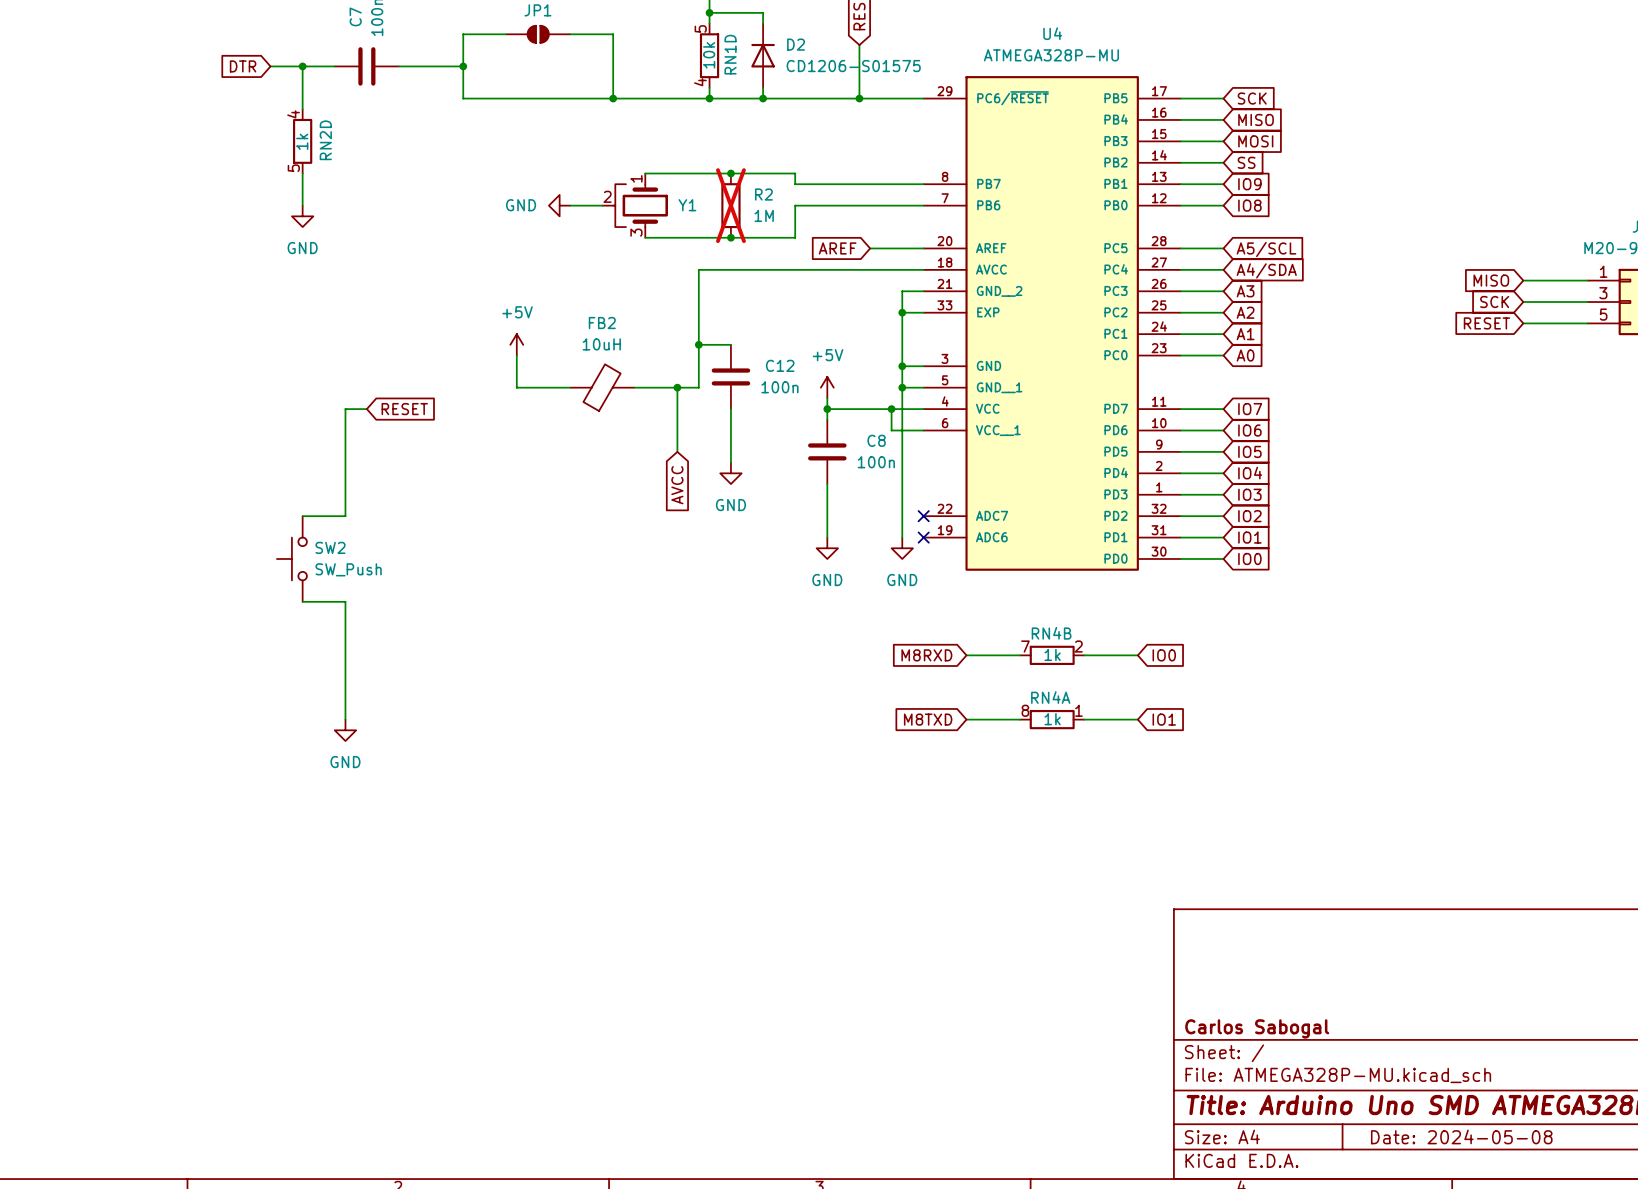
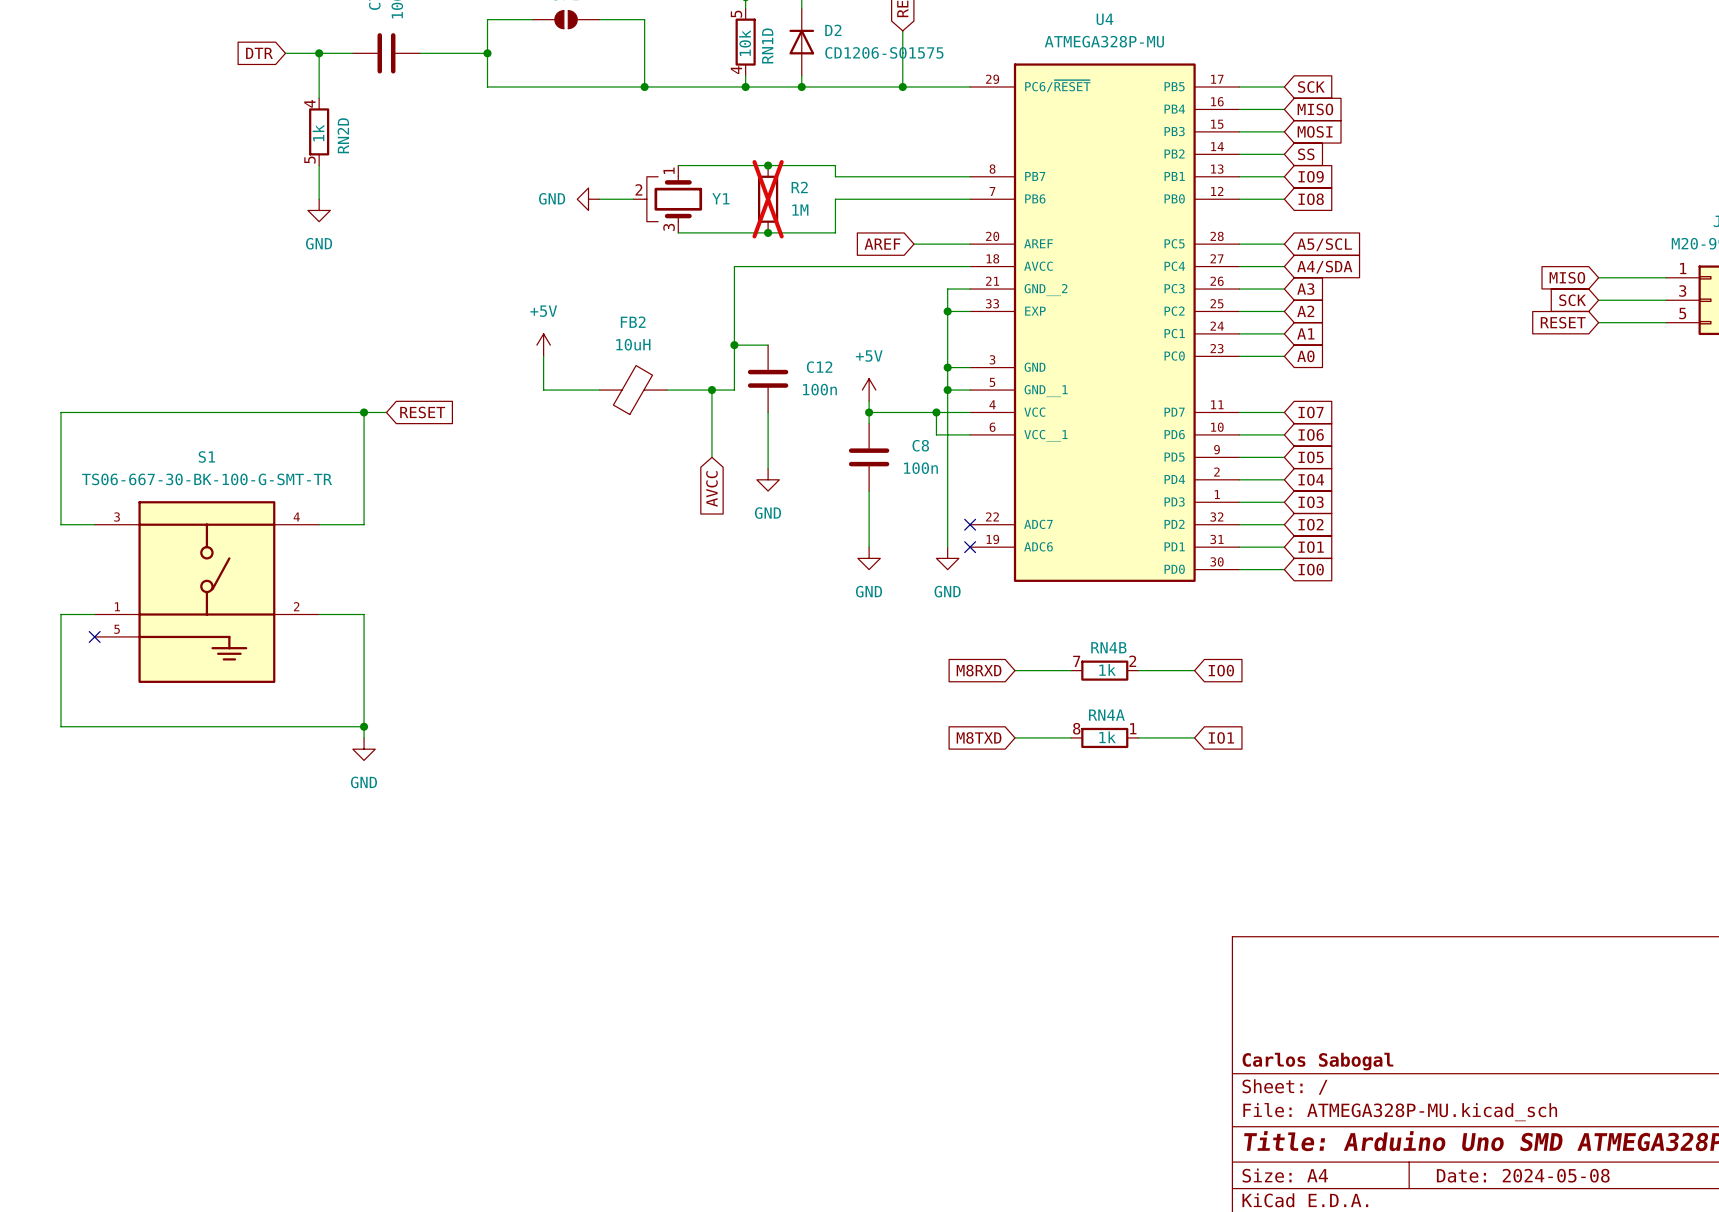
wire: none -> (364, 412) (61, 412) (61, 524) (94, 524)
junction: none -> (364, 412)
SW2: SW_Push (291, 558) -> none
S1: none -> TS06-667-30-BK-100-G-SMT-TR (206, 592)
wire: none -> (94, 614) (61, 614) (61, 726) (364, 726)
no-connect mark: none -> (94, 636)
junction: none -> (364, 726)

